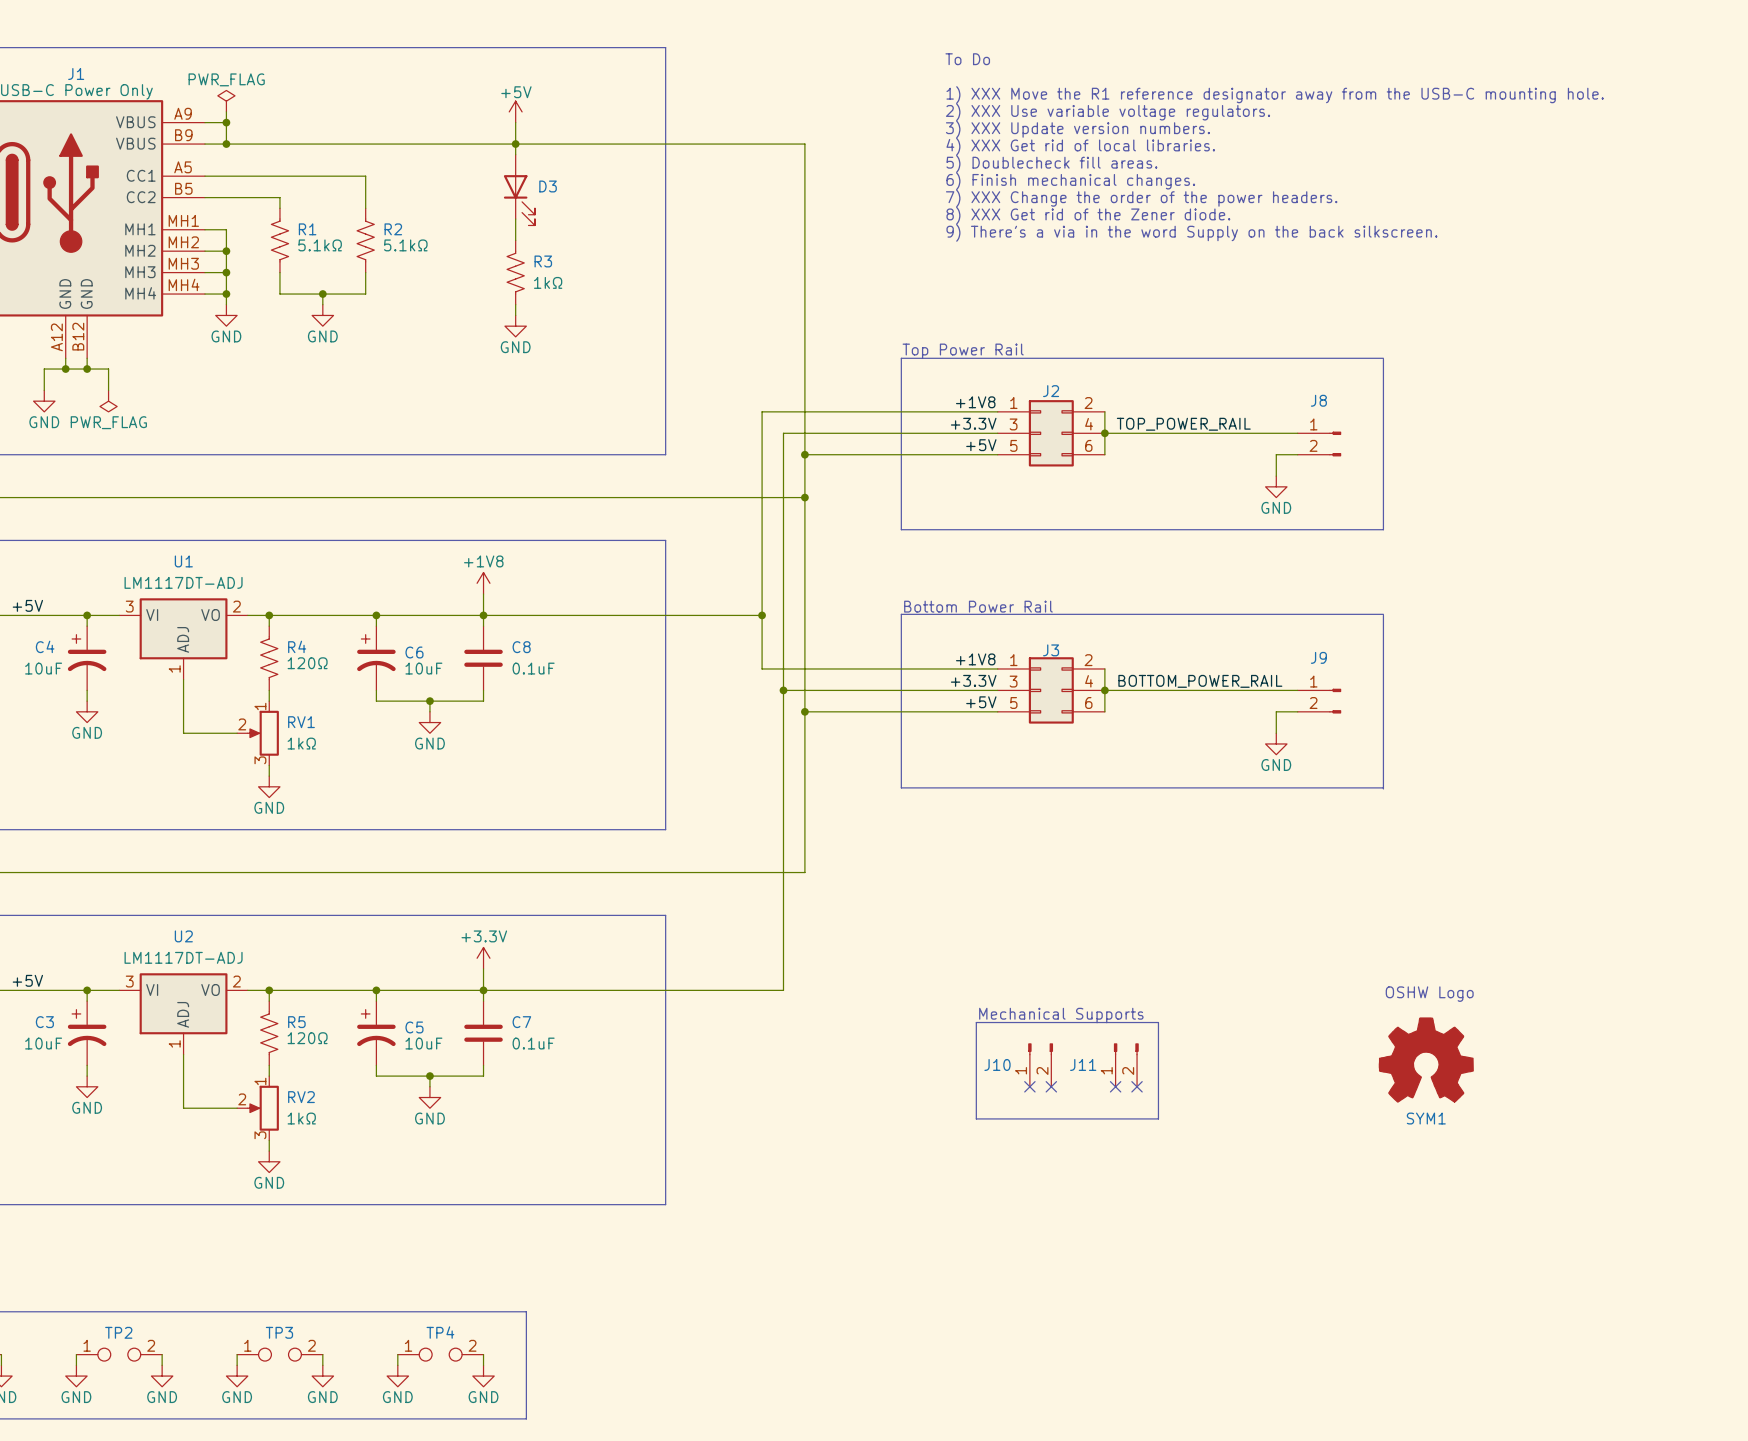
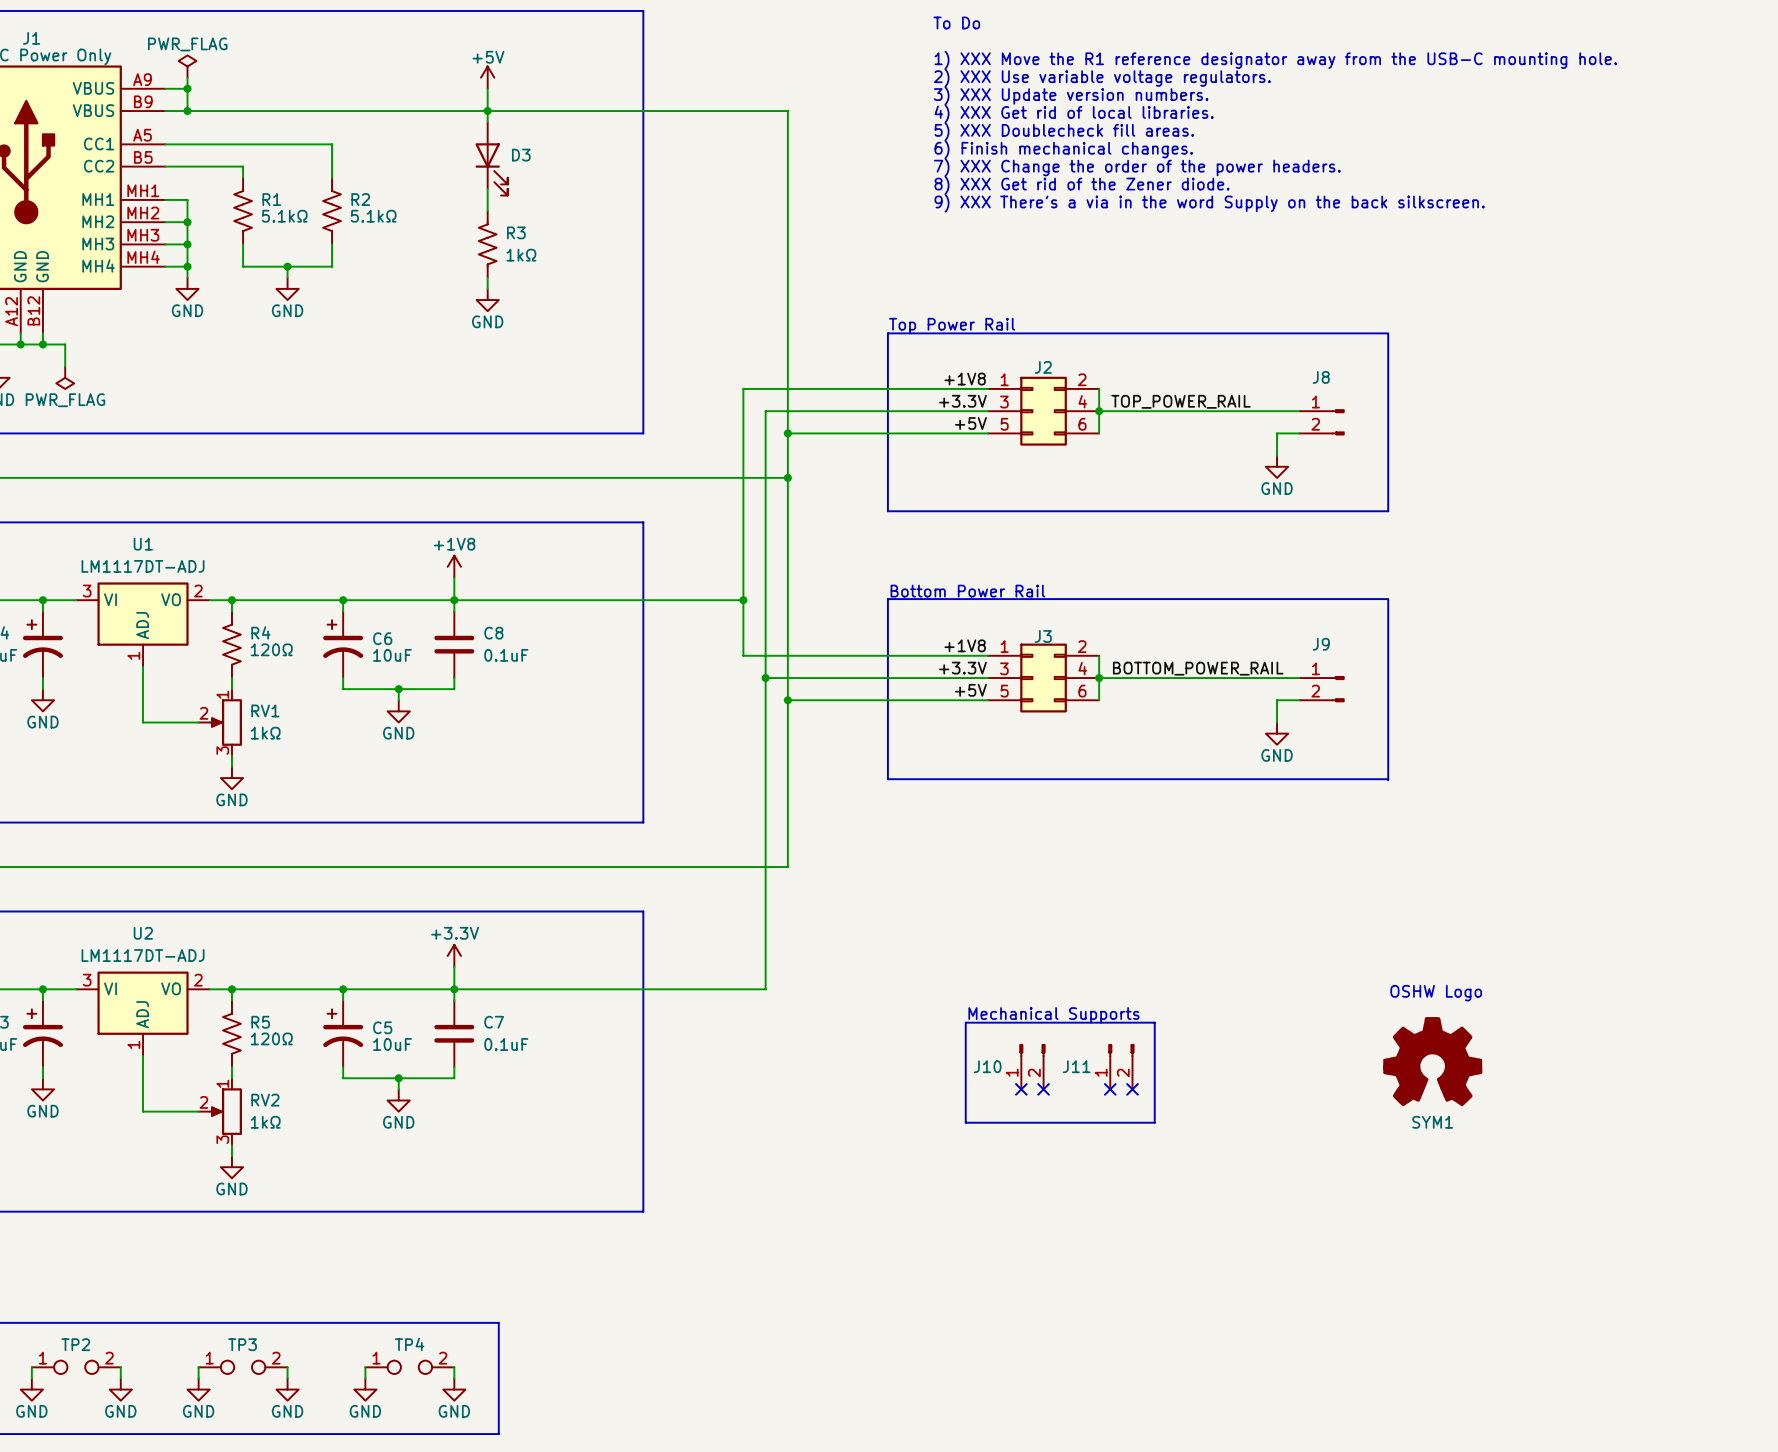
text: 5) Doublecheck fill areas. (1051, 163) -> 5) XXX Doublecheck fill areas. (1064, 131)
text: 9) There's a via in the word Supply on the back silkscreen. (1191, 232) -> 9) XXX There's a via in the word Supply on the back silkscreen. (1209, 203)

